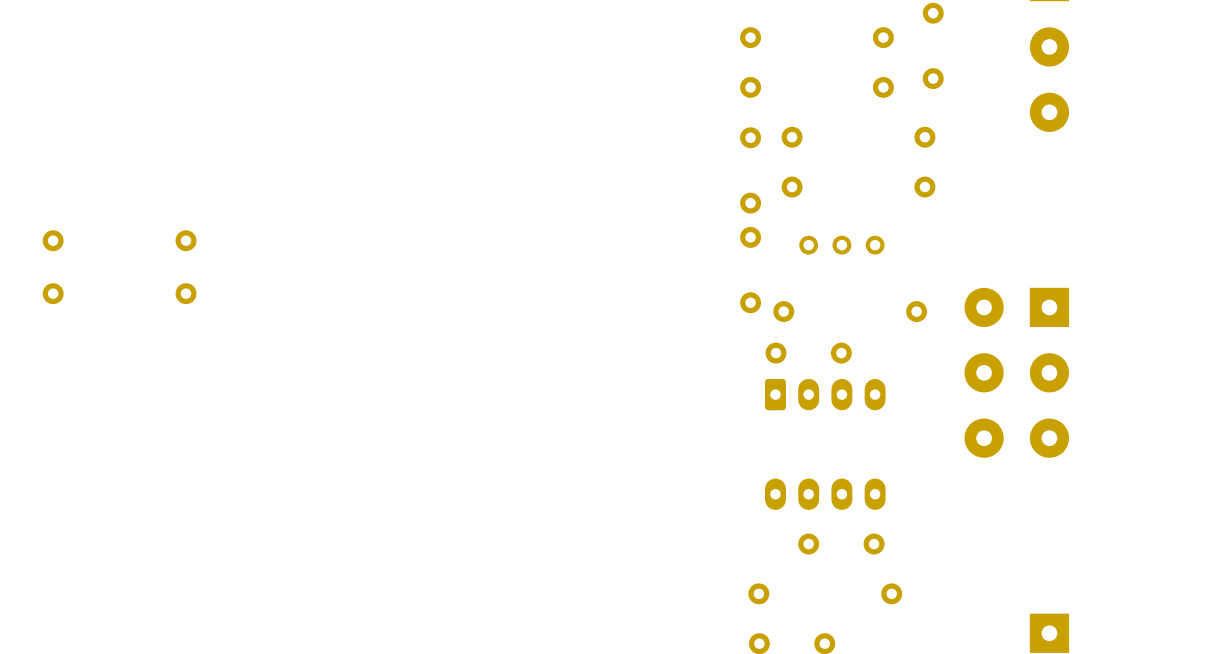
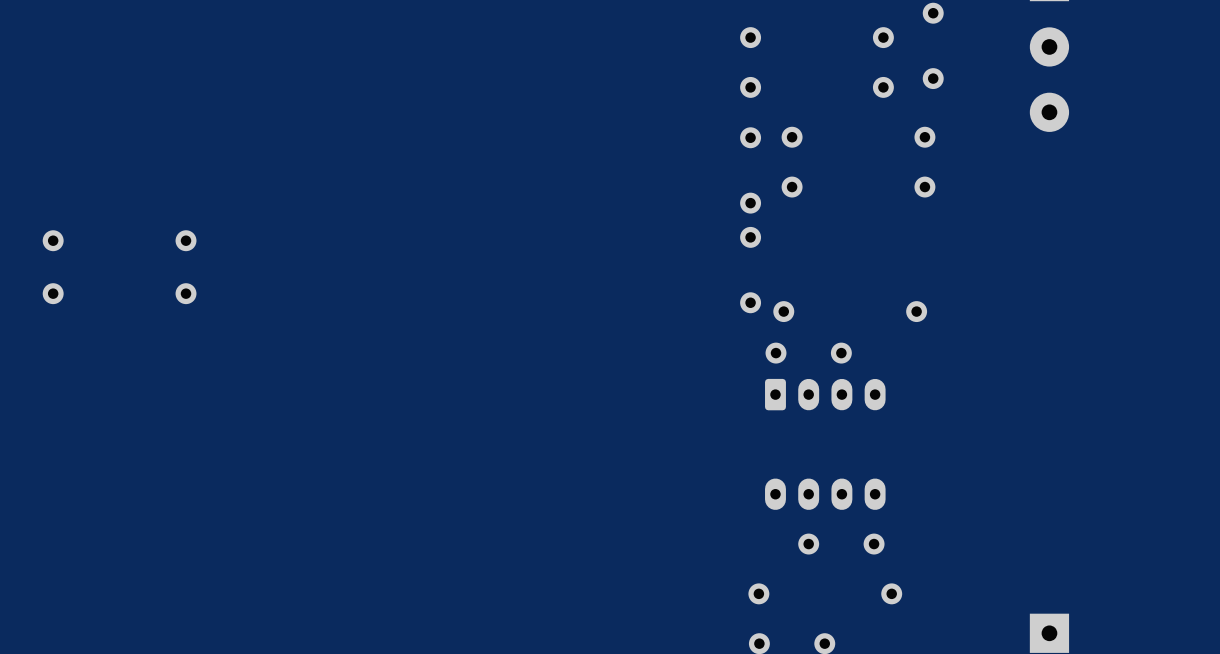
part: (841, 245) -> none
part: (1016, 372) -> none

